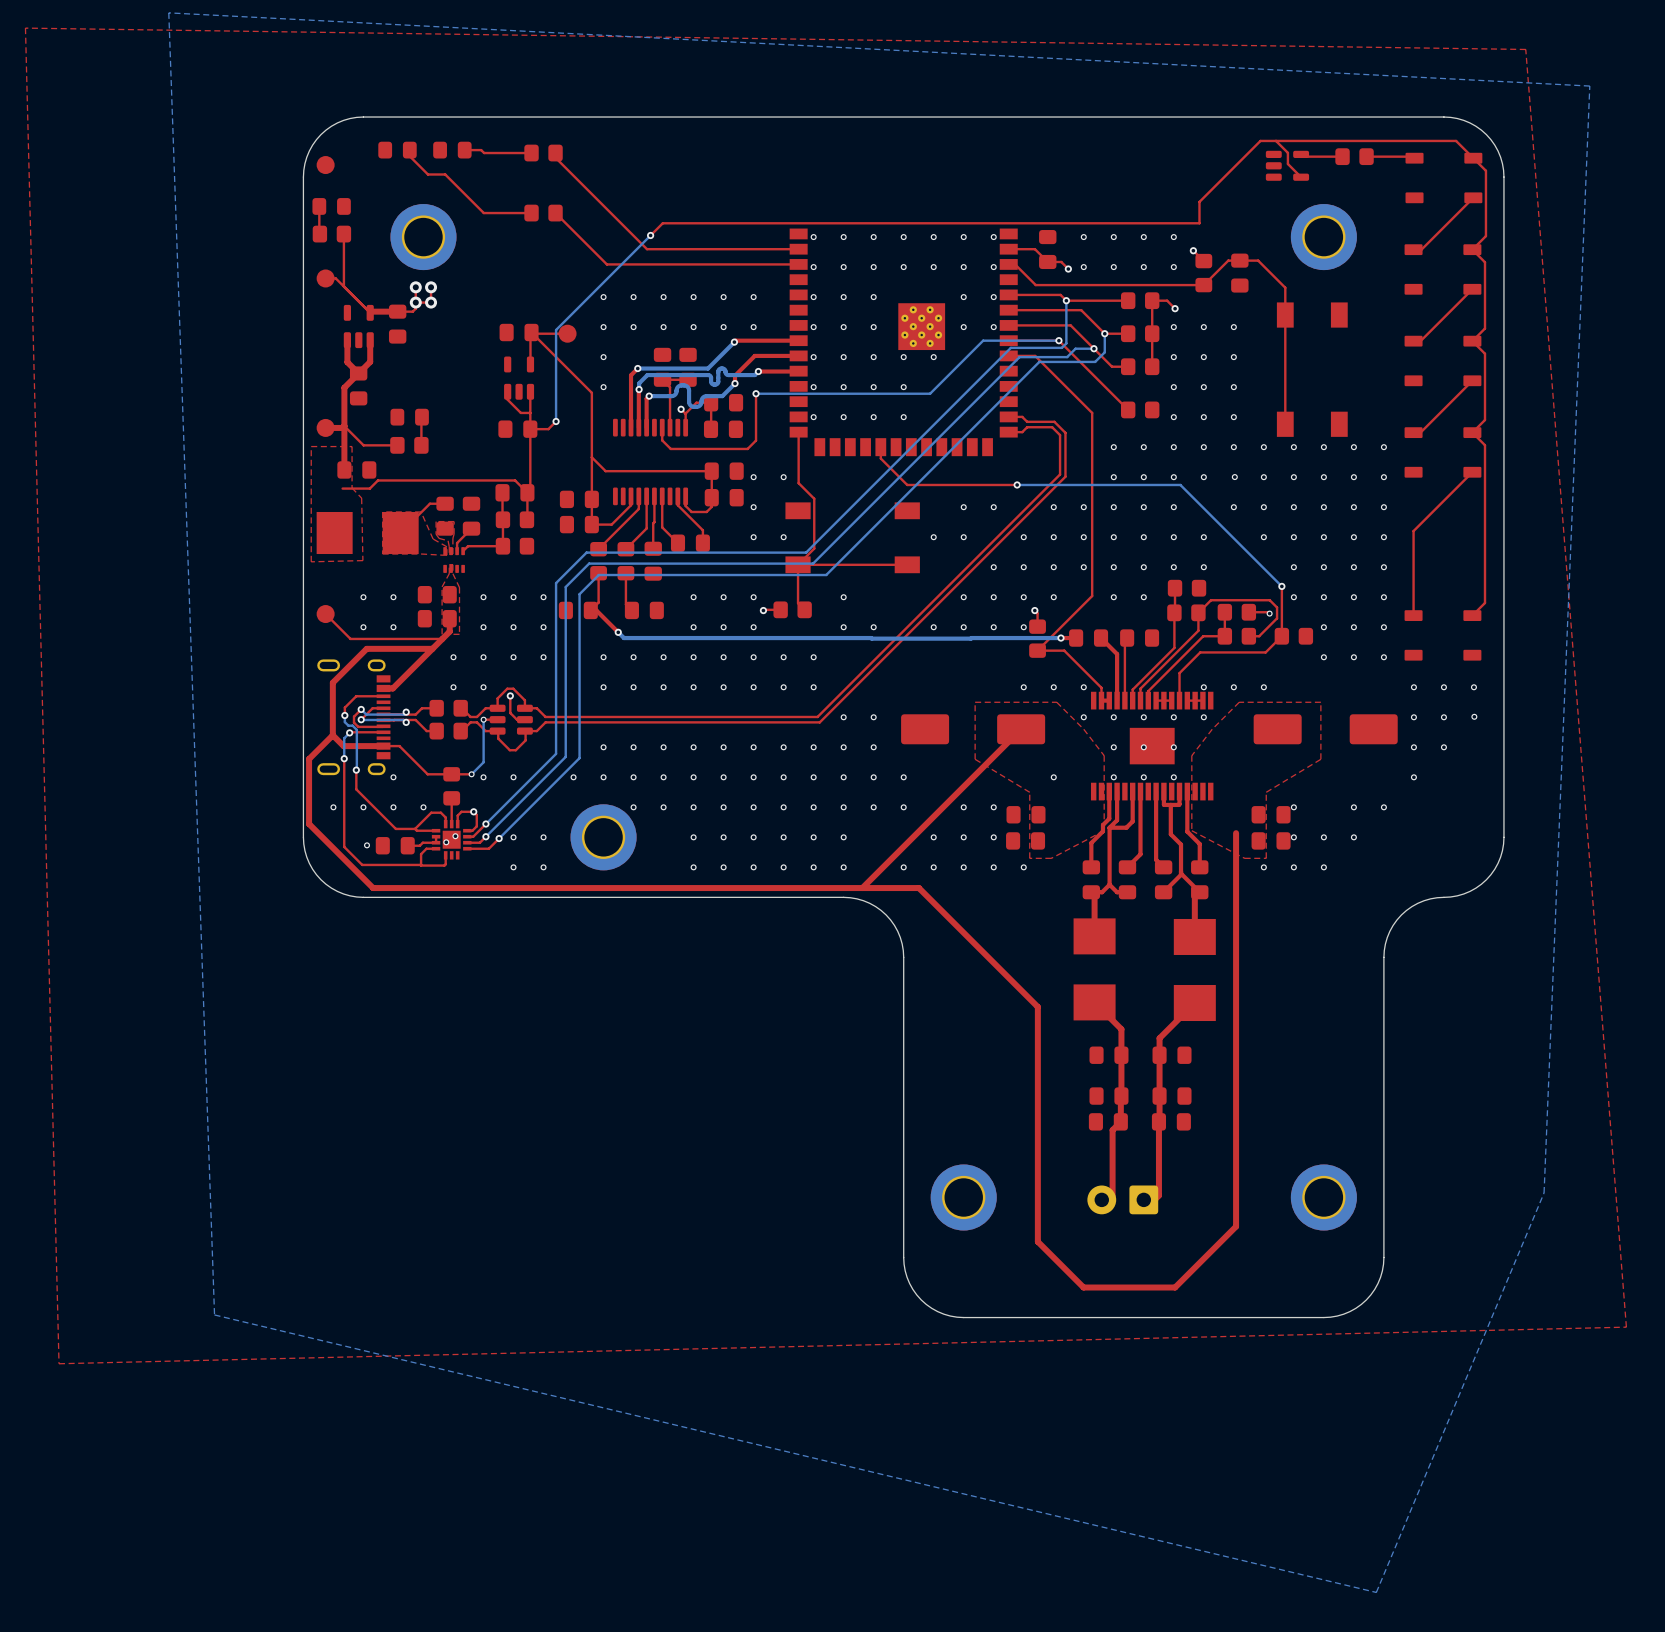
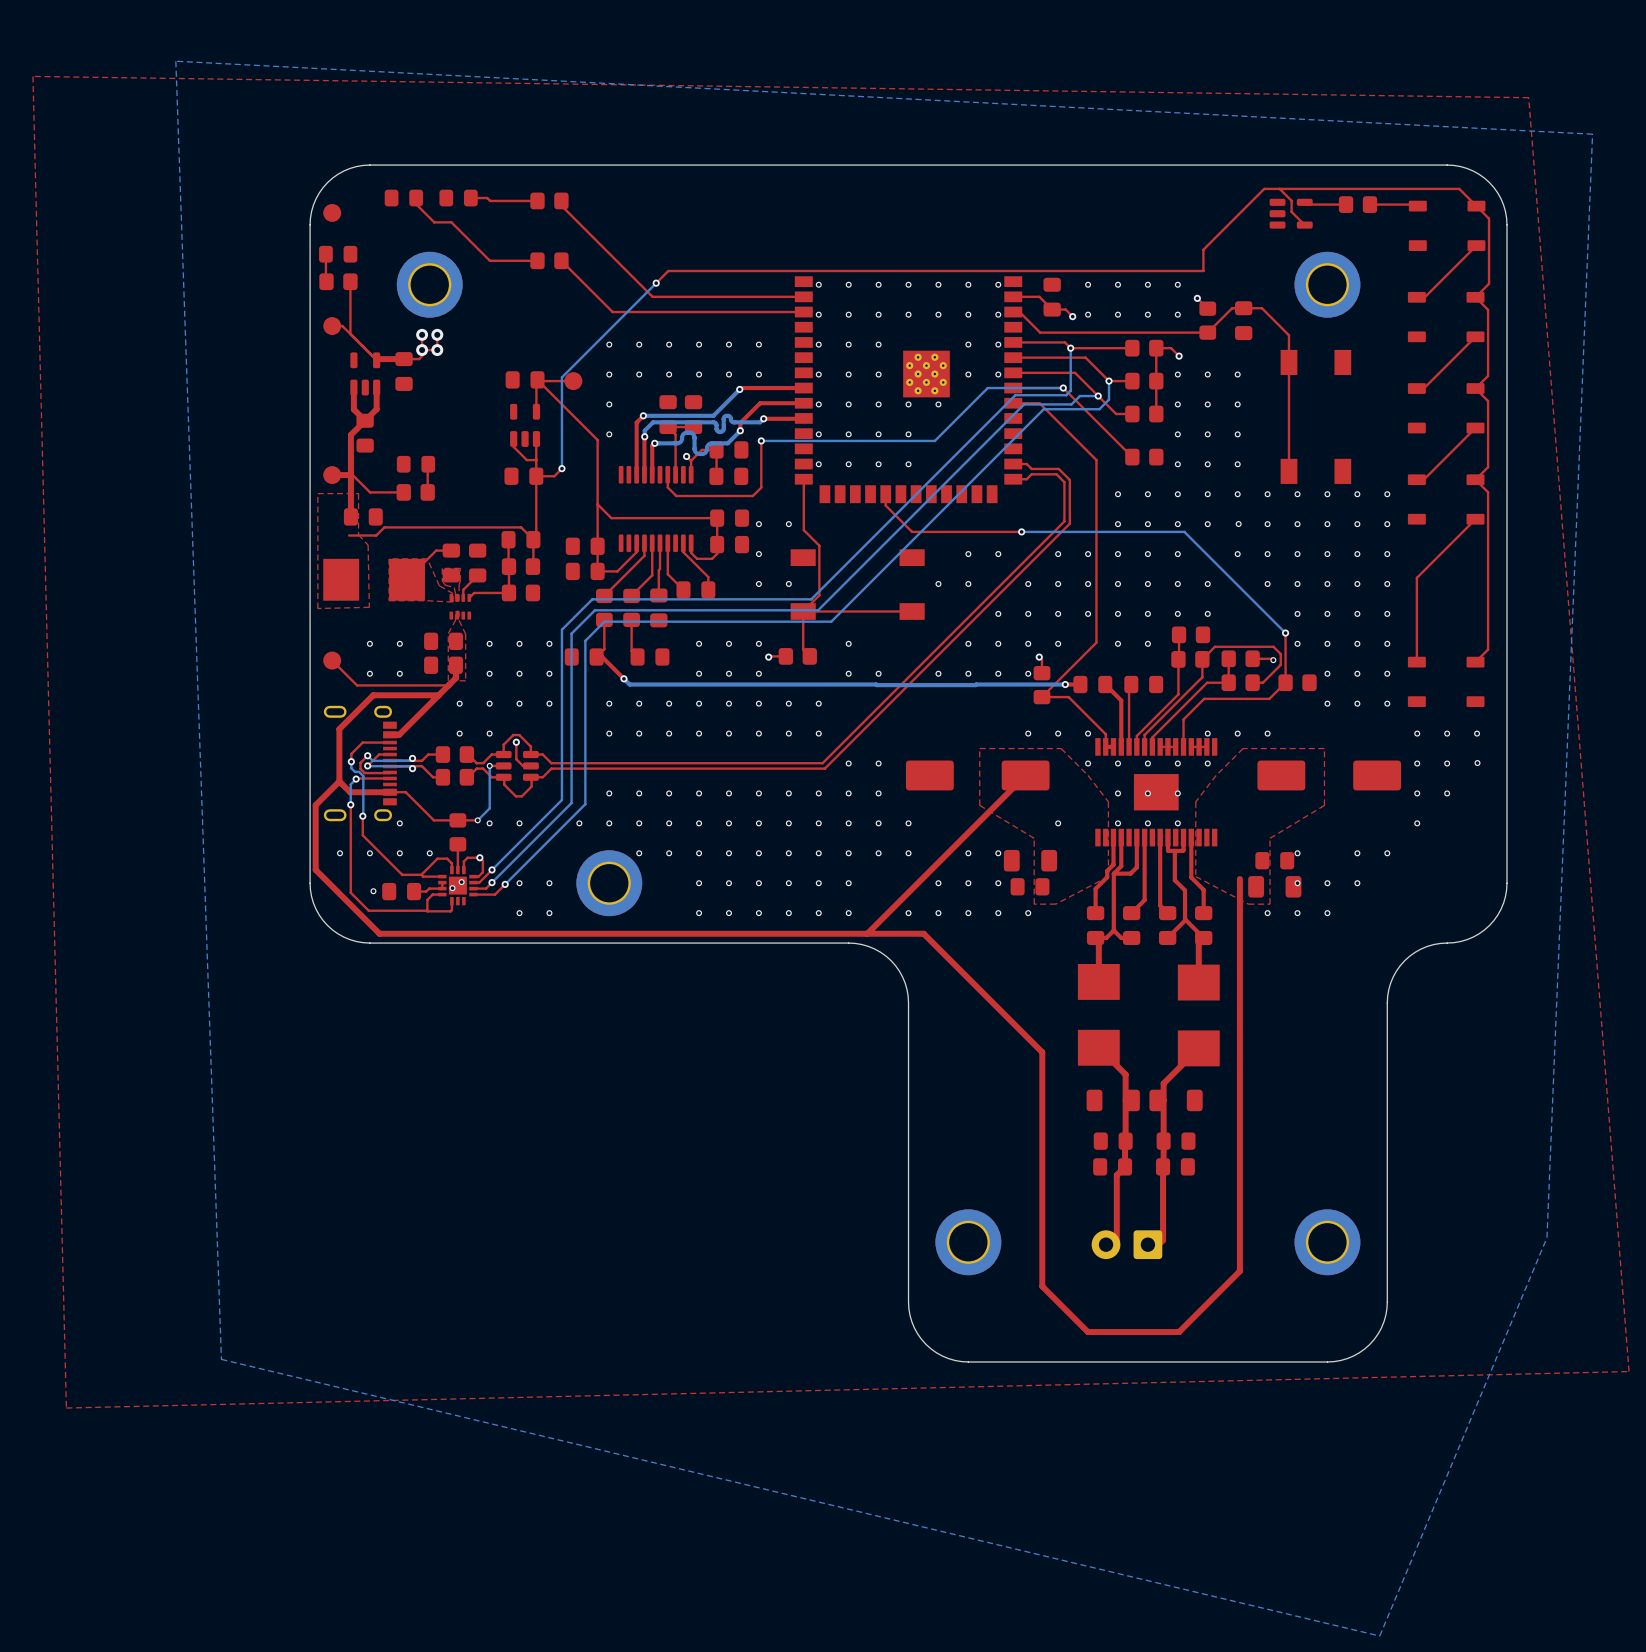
part footprint: [1006, 806, 1046, 824] -> [1003, 849, 1058, 872]
part footprint: [1251, 832, 1291, 850] -> [1248, 876, 1302, 898]
part footprint: [1089, 1046, 1129, 1064] -> [1086, 1089, 1140, 1112]
part footprint: [1152, 1046, 1192, 1064] -> [1149, 1089, 1203, 1112]

